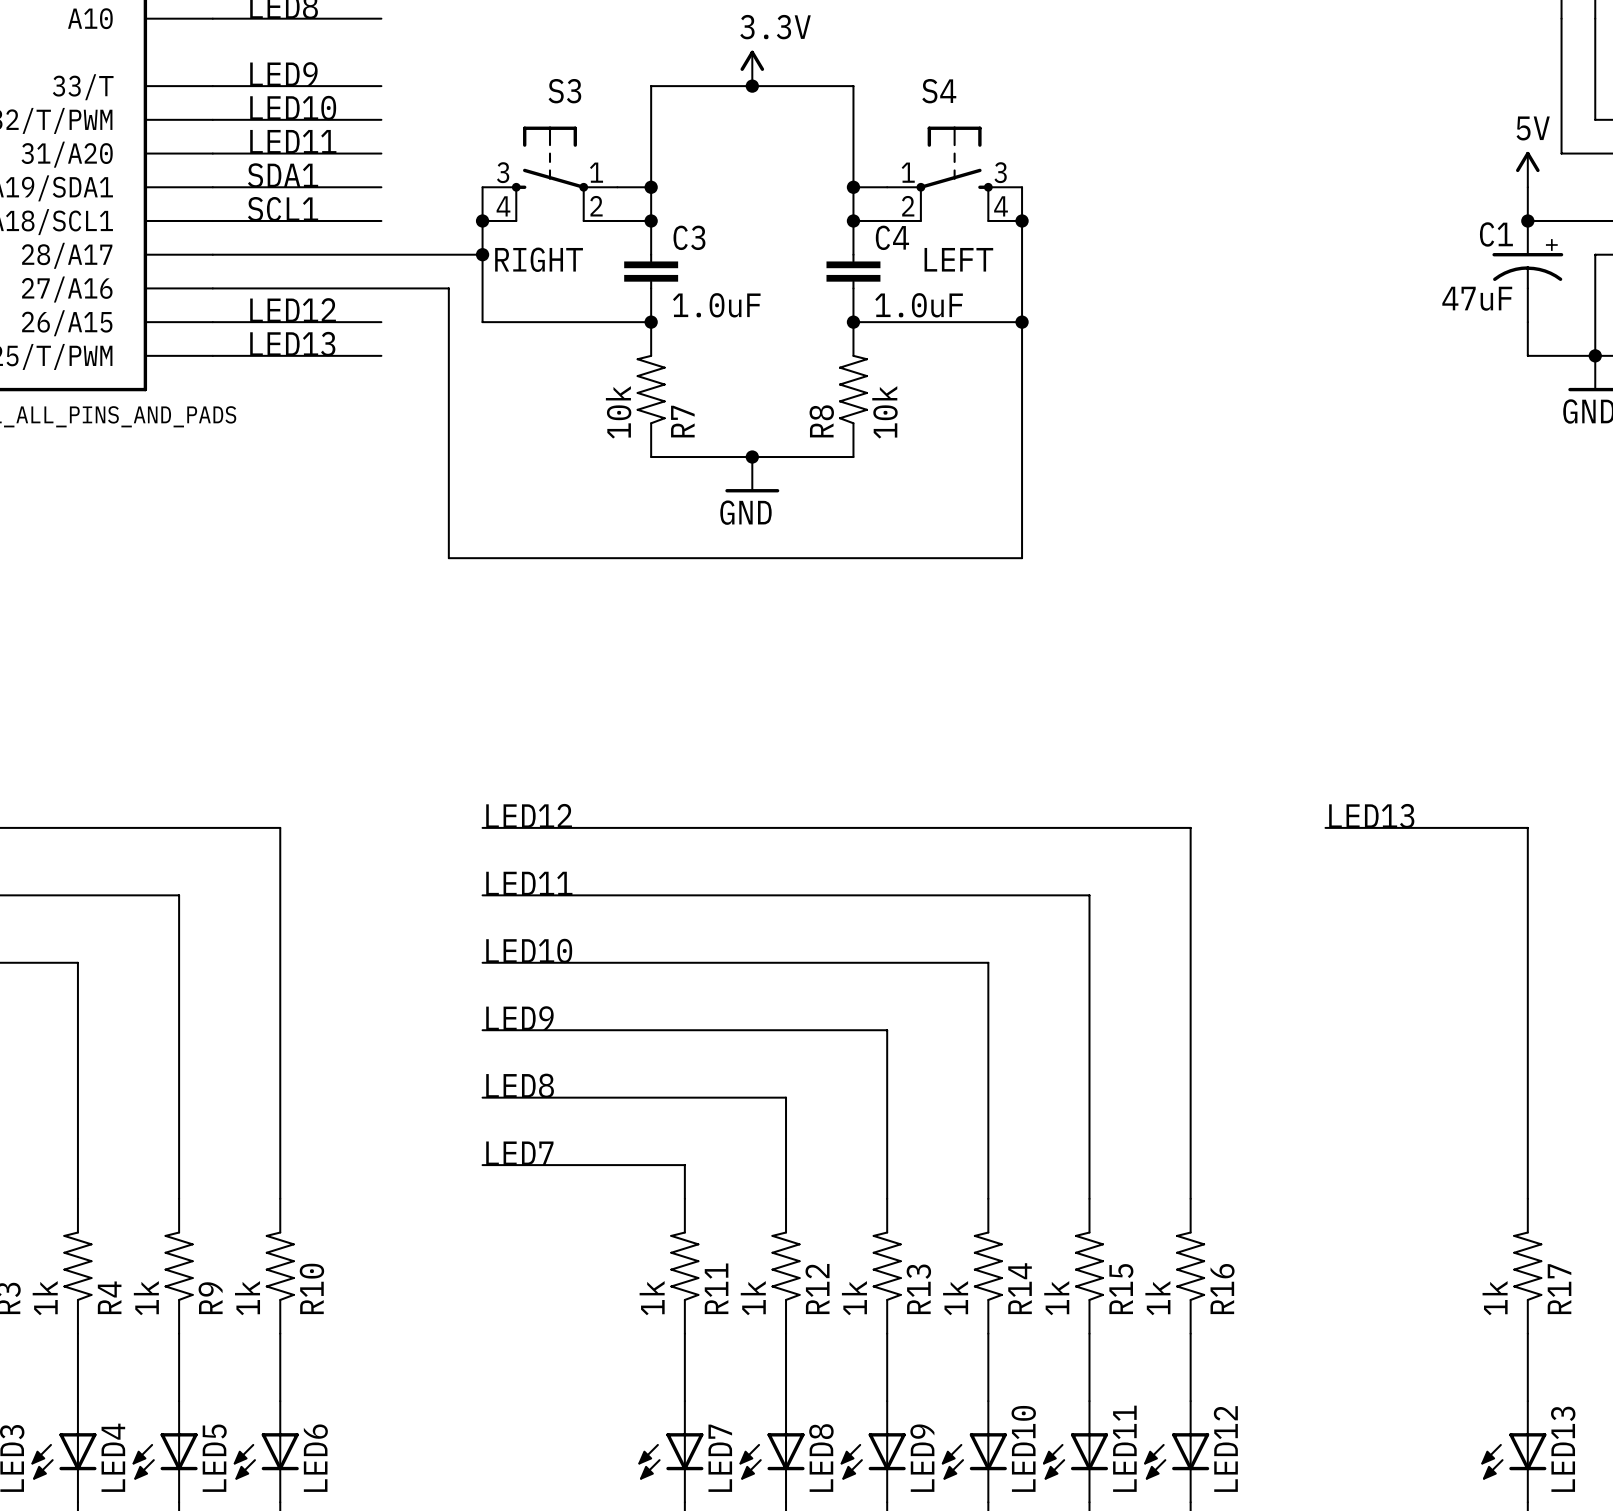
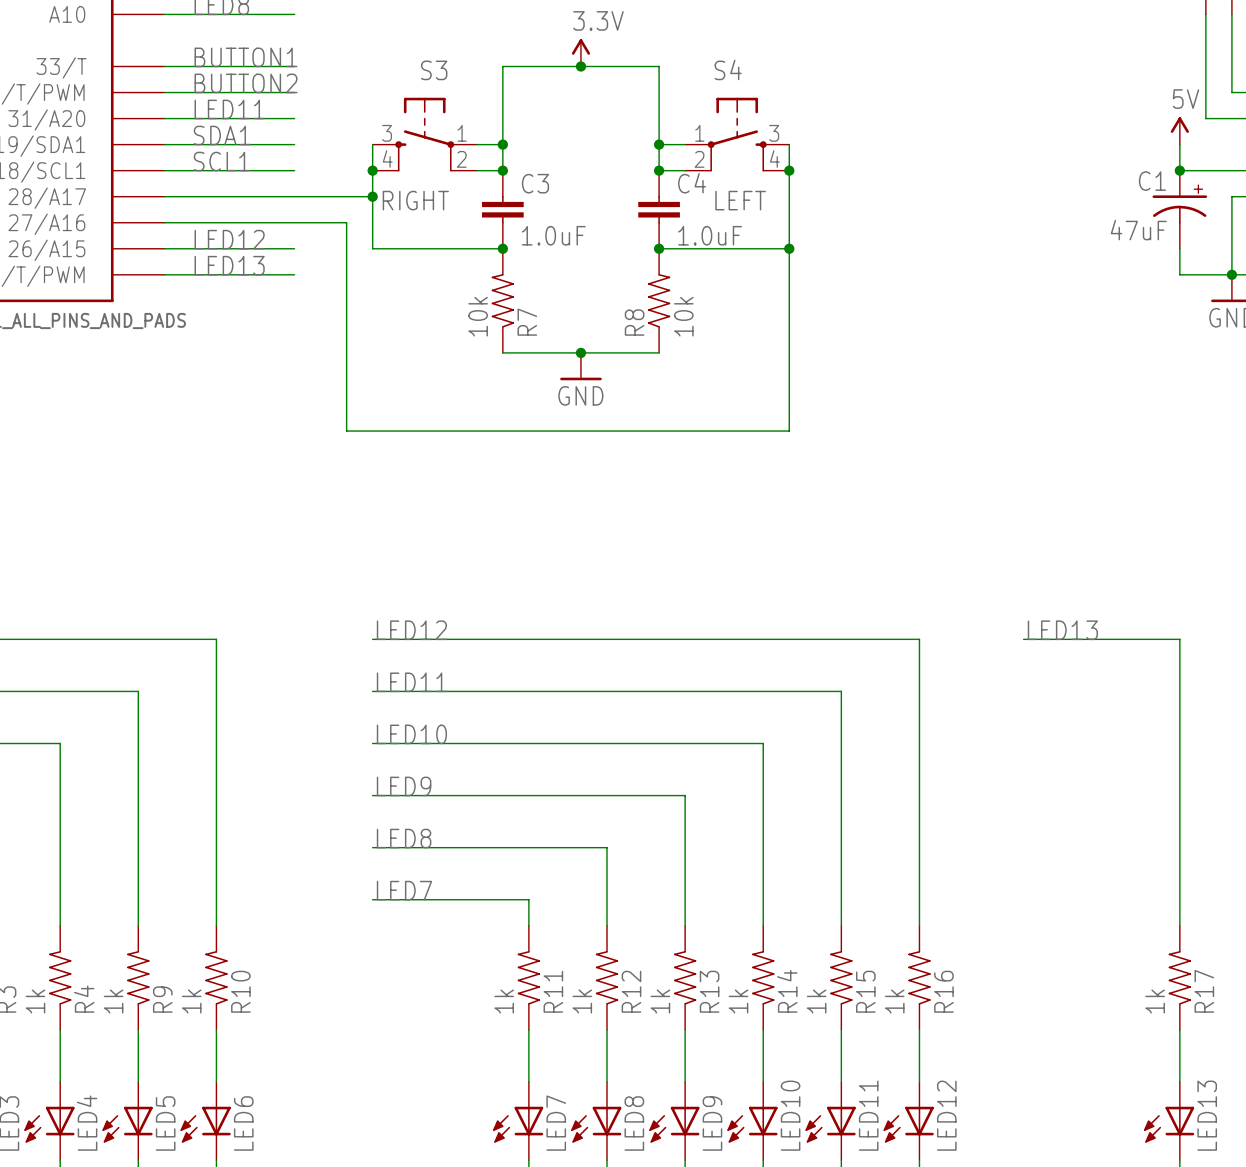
label: LED9 (283, 74) -> BUTTON1 (246, 57)
label: LED10 (293, 108) -> BUTTON2 (246, 83)

